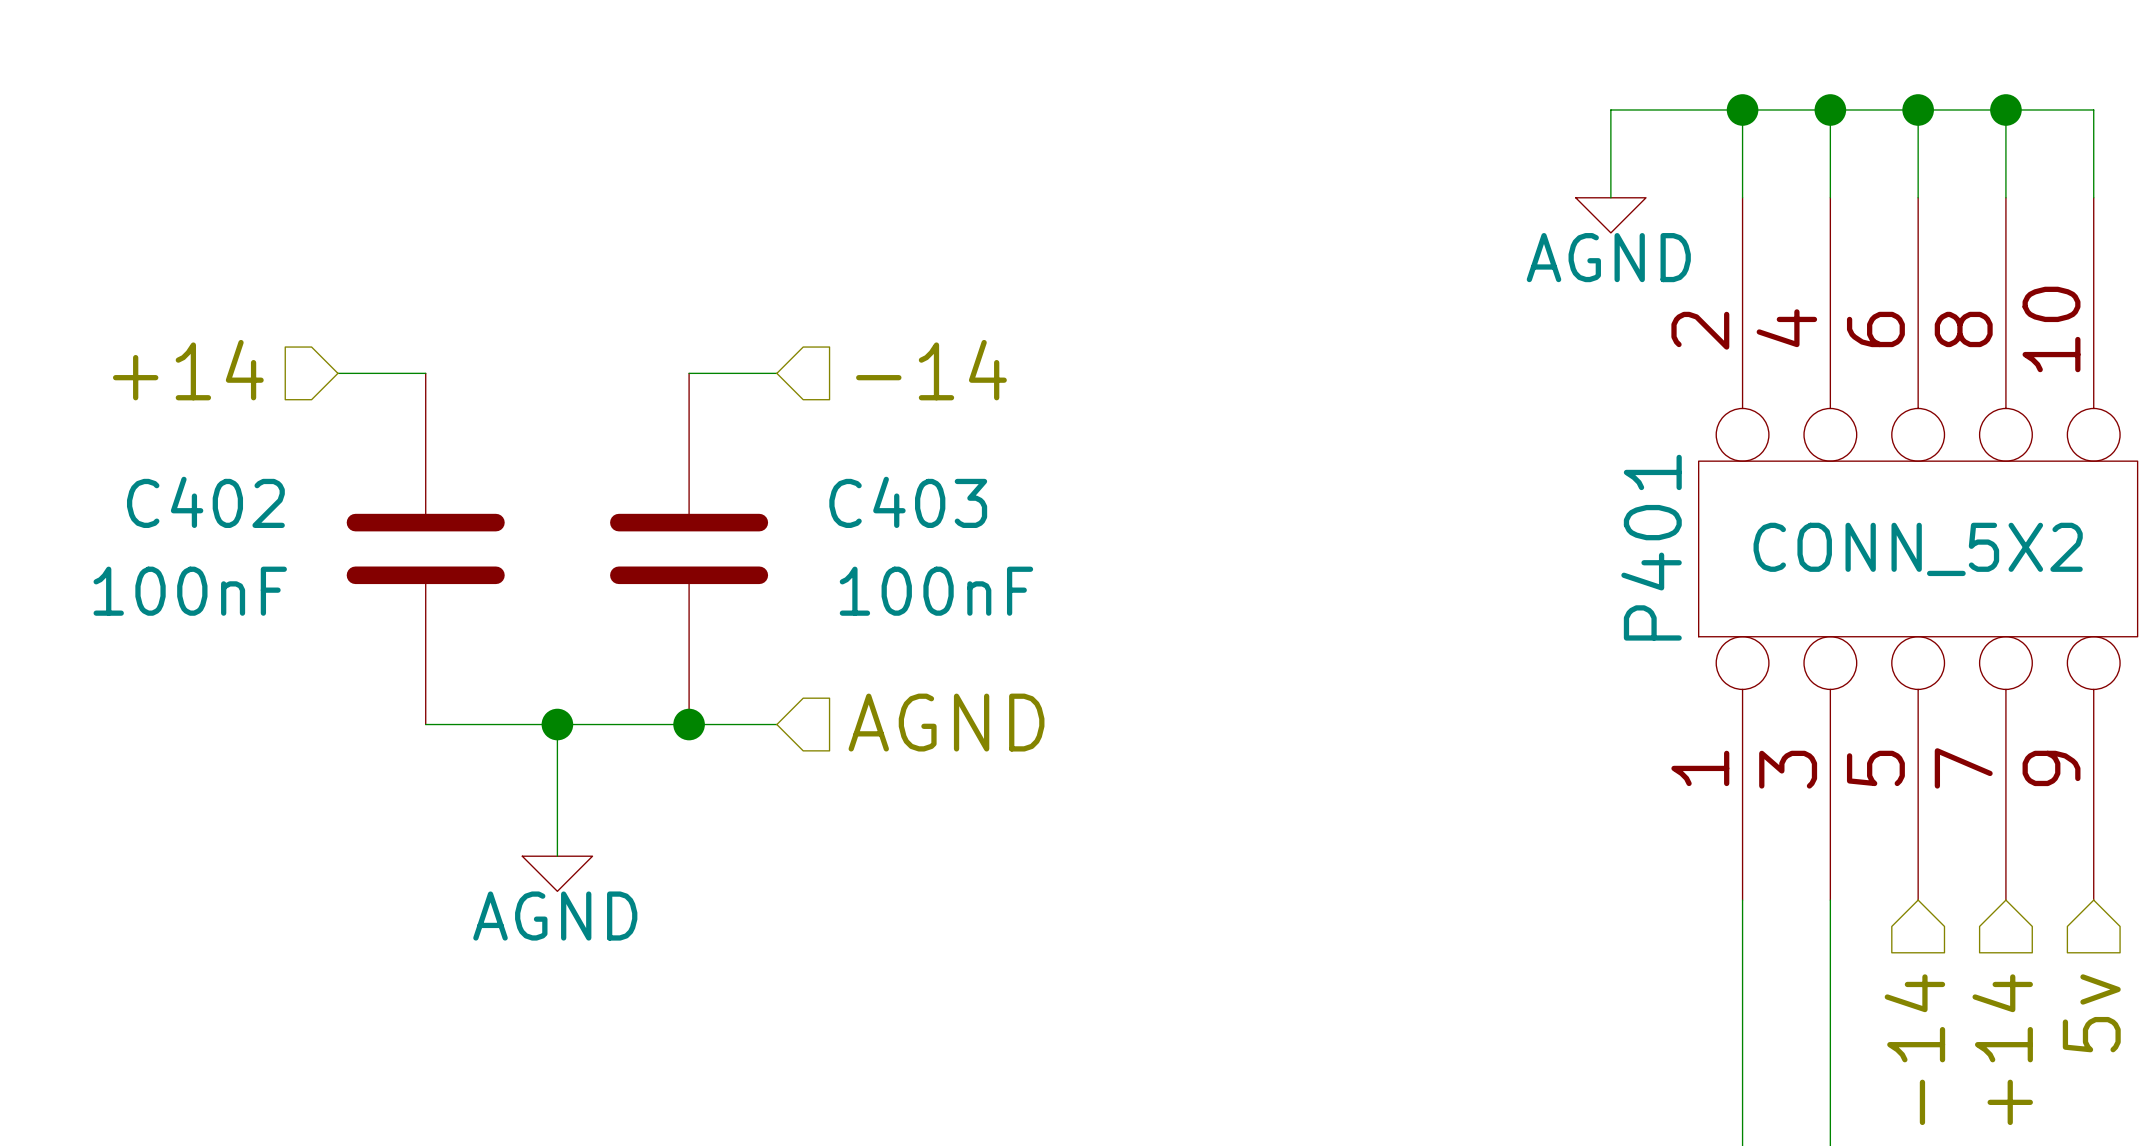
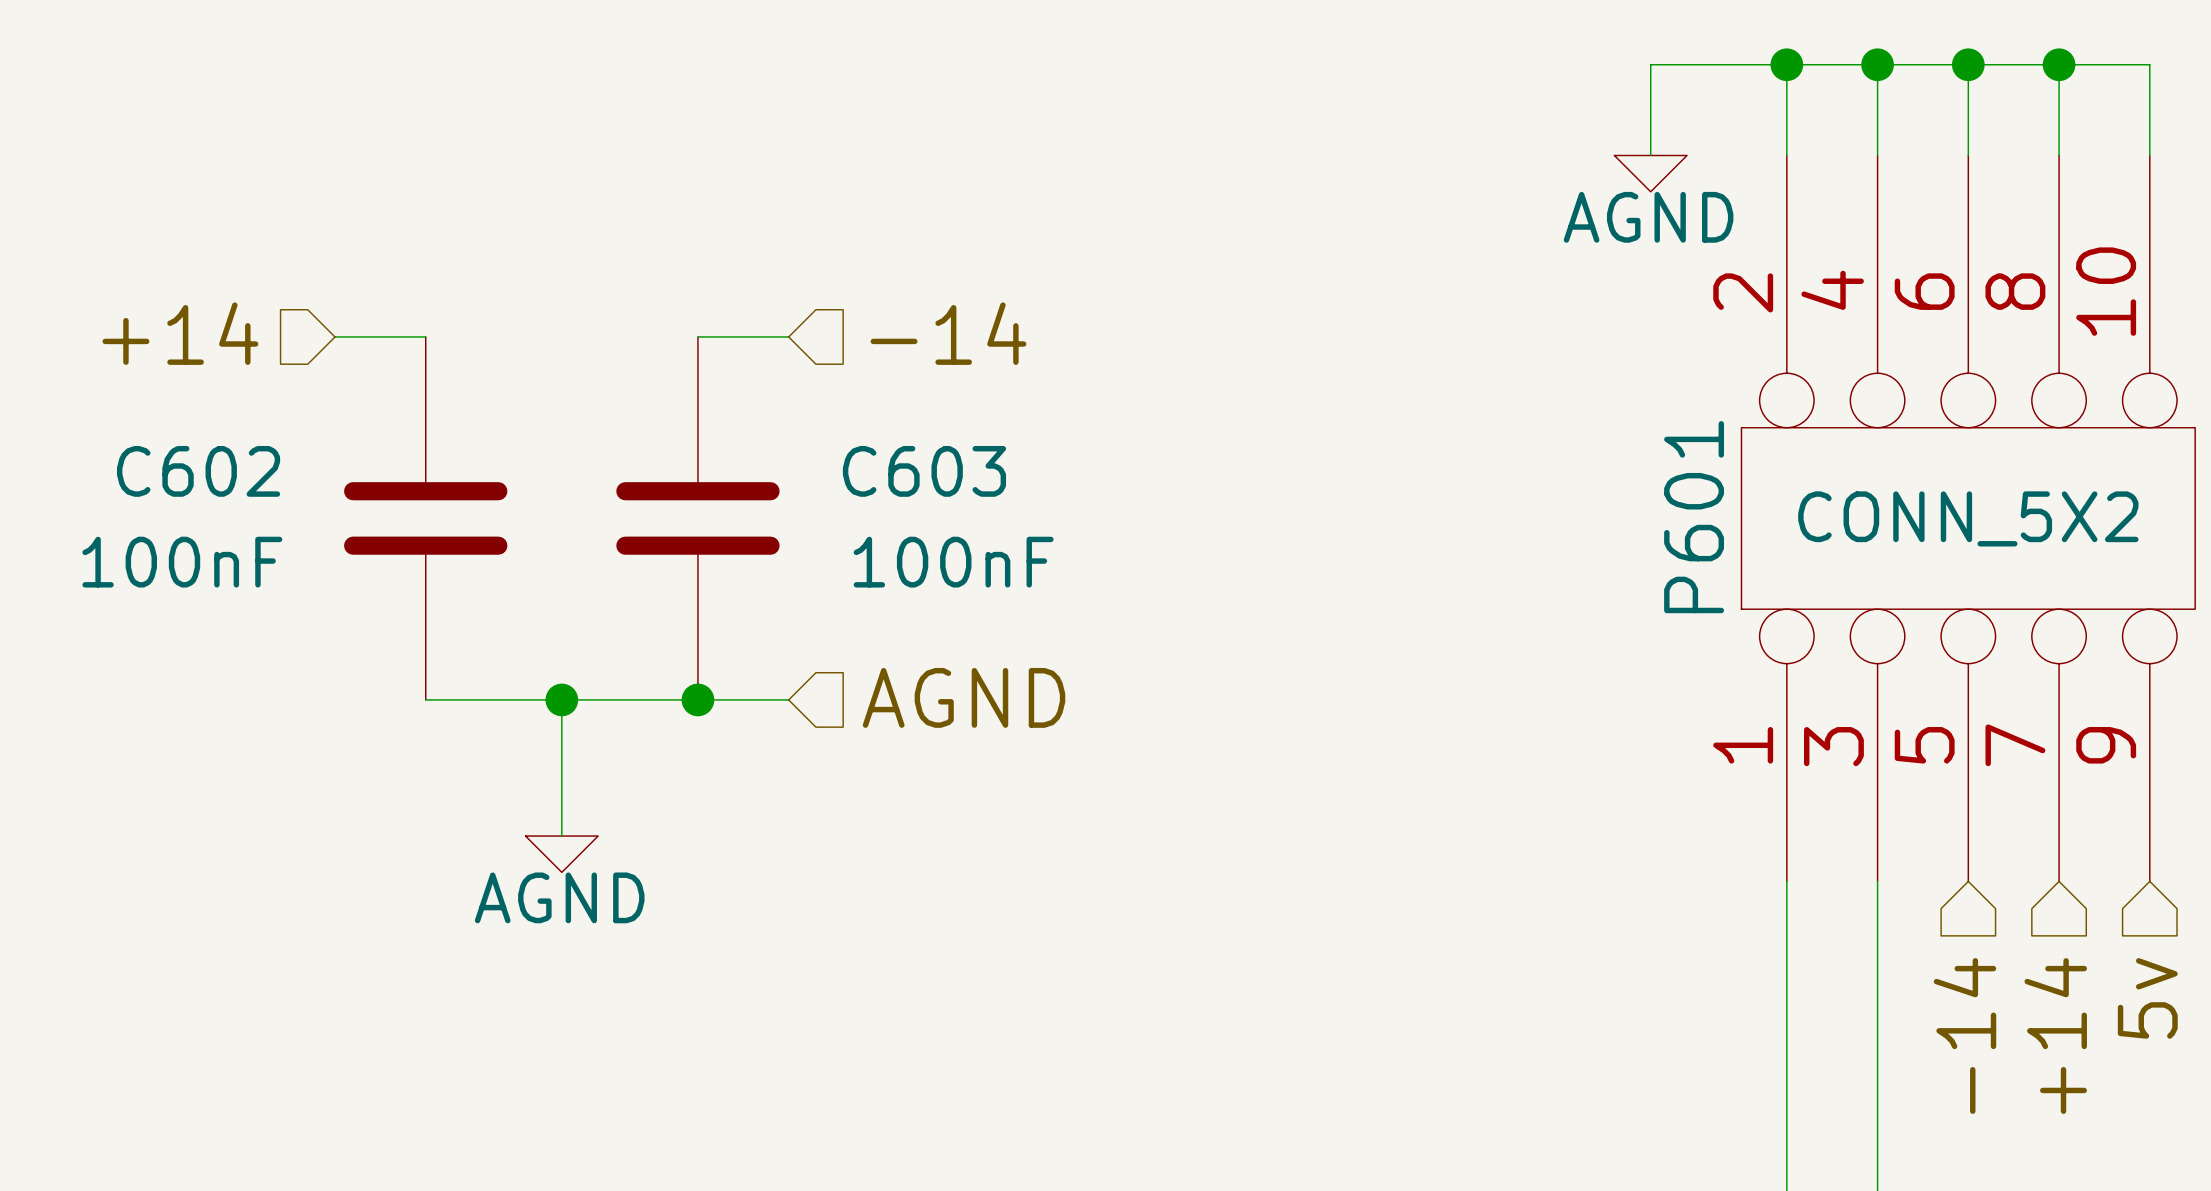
C402 name: C402 (205, 502) -> C602 (198, 471)
C403 name: C403 (908, 502) -> C603 (924, 471)
P401 name: P401 (1651, 547) -> P601 (1694, 517)

